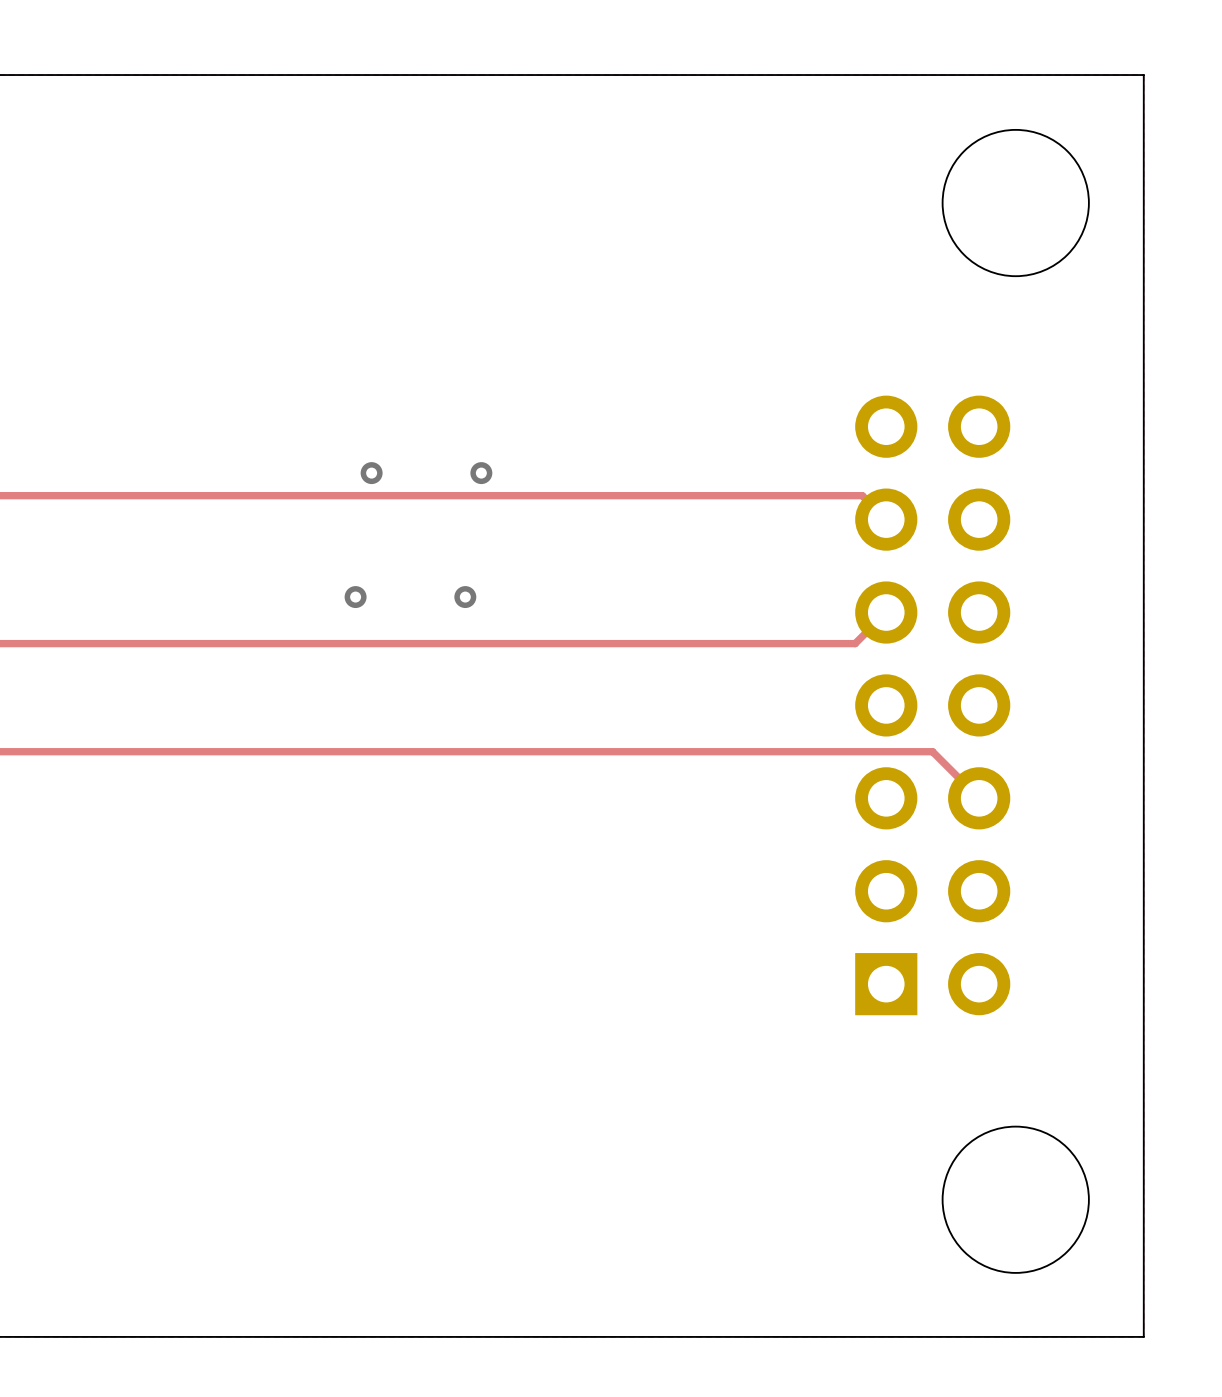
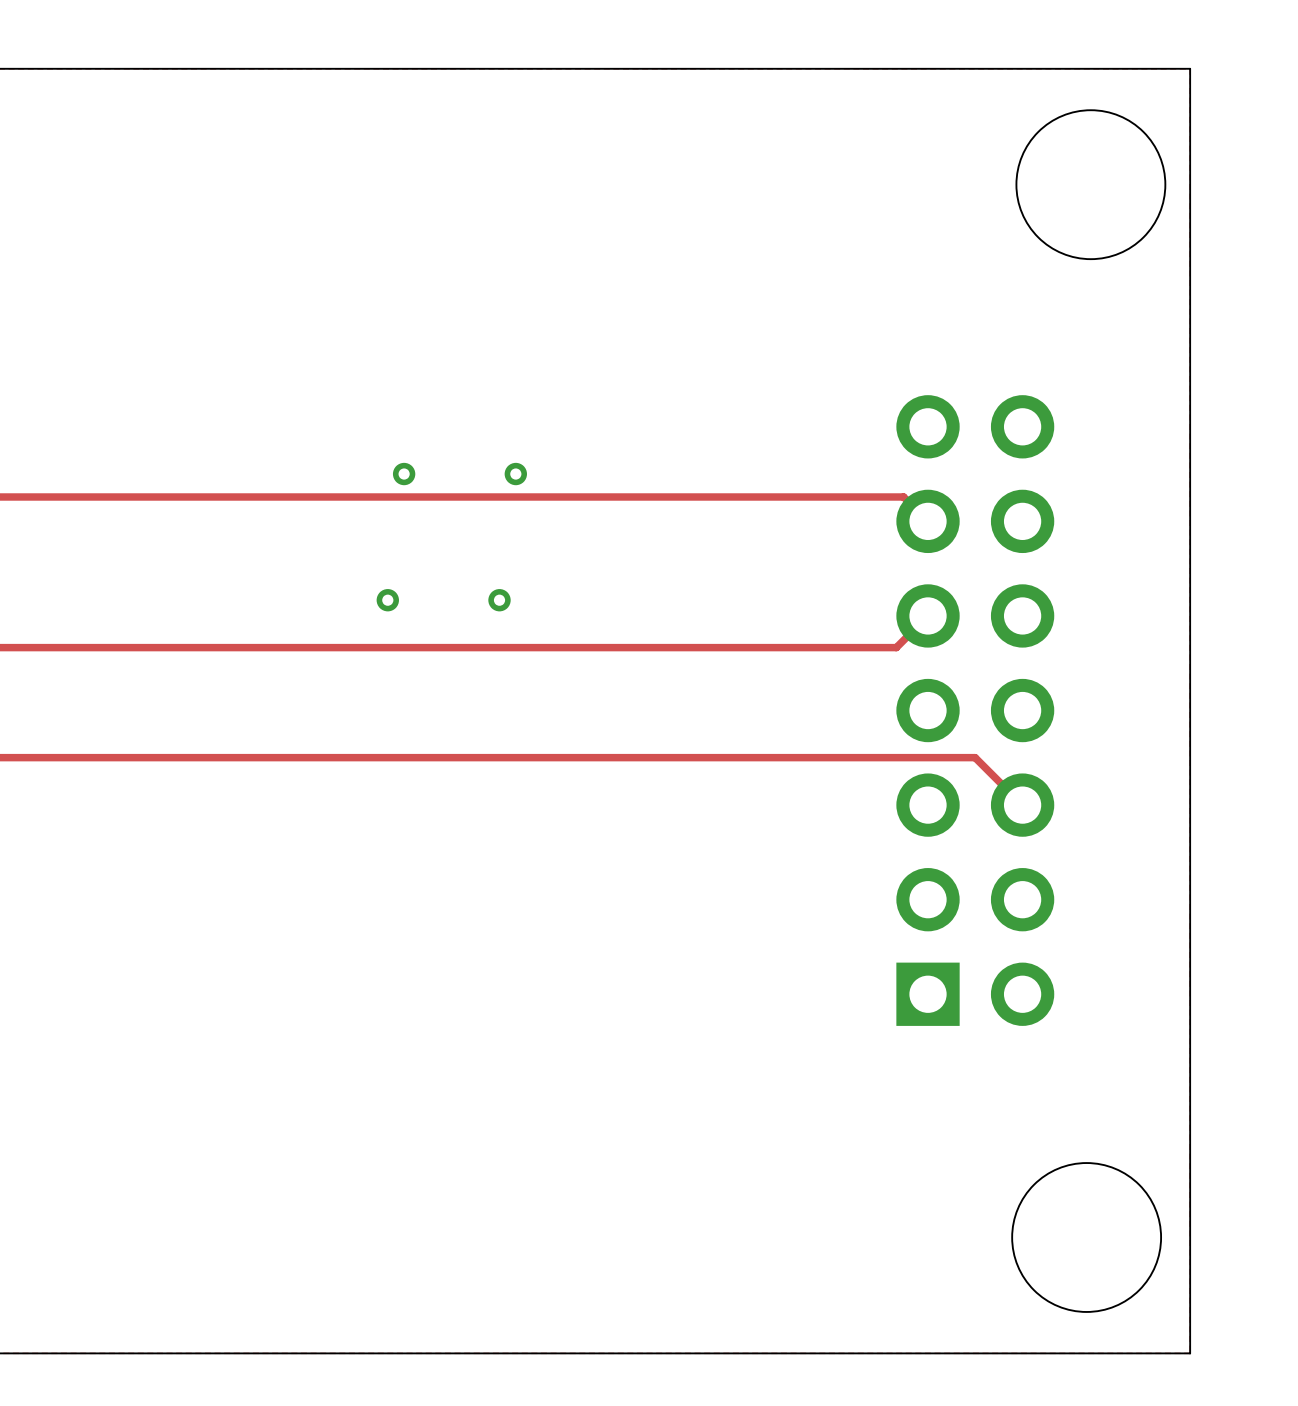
round board edge position: (1015, 203) -> (1090, 184)
round board edge position: (1015, 1199) -> (1086, 1237)

